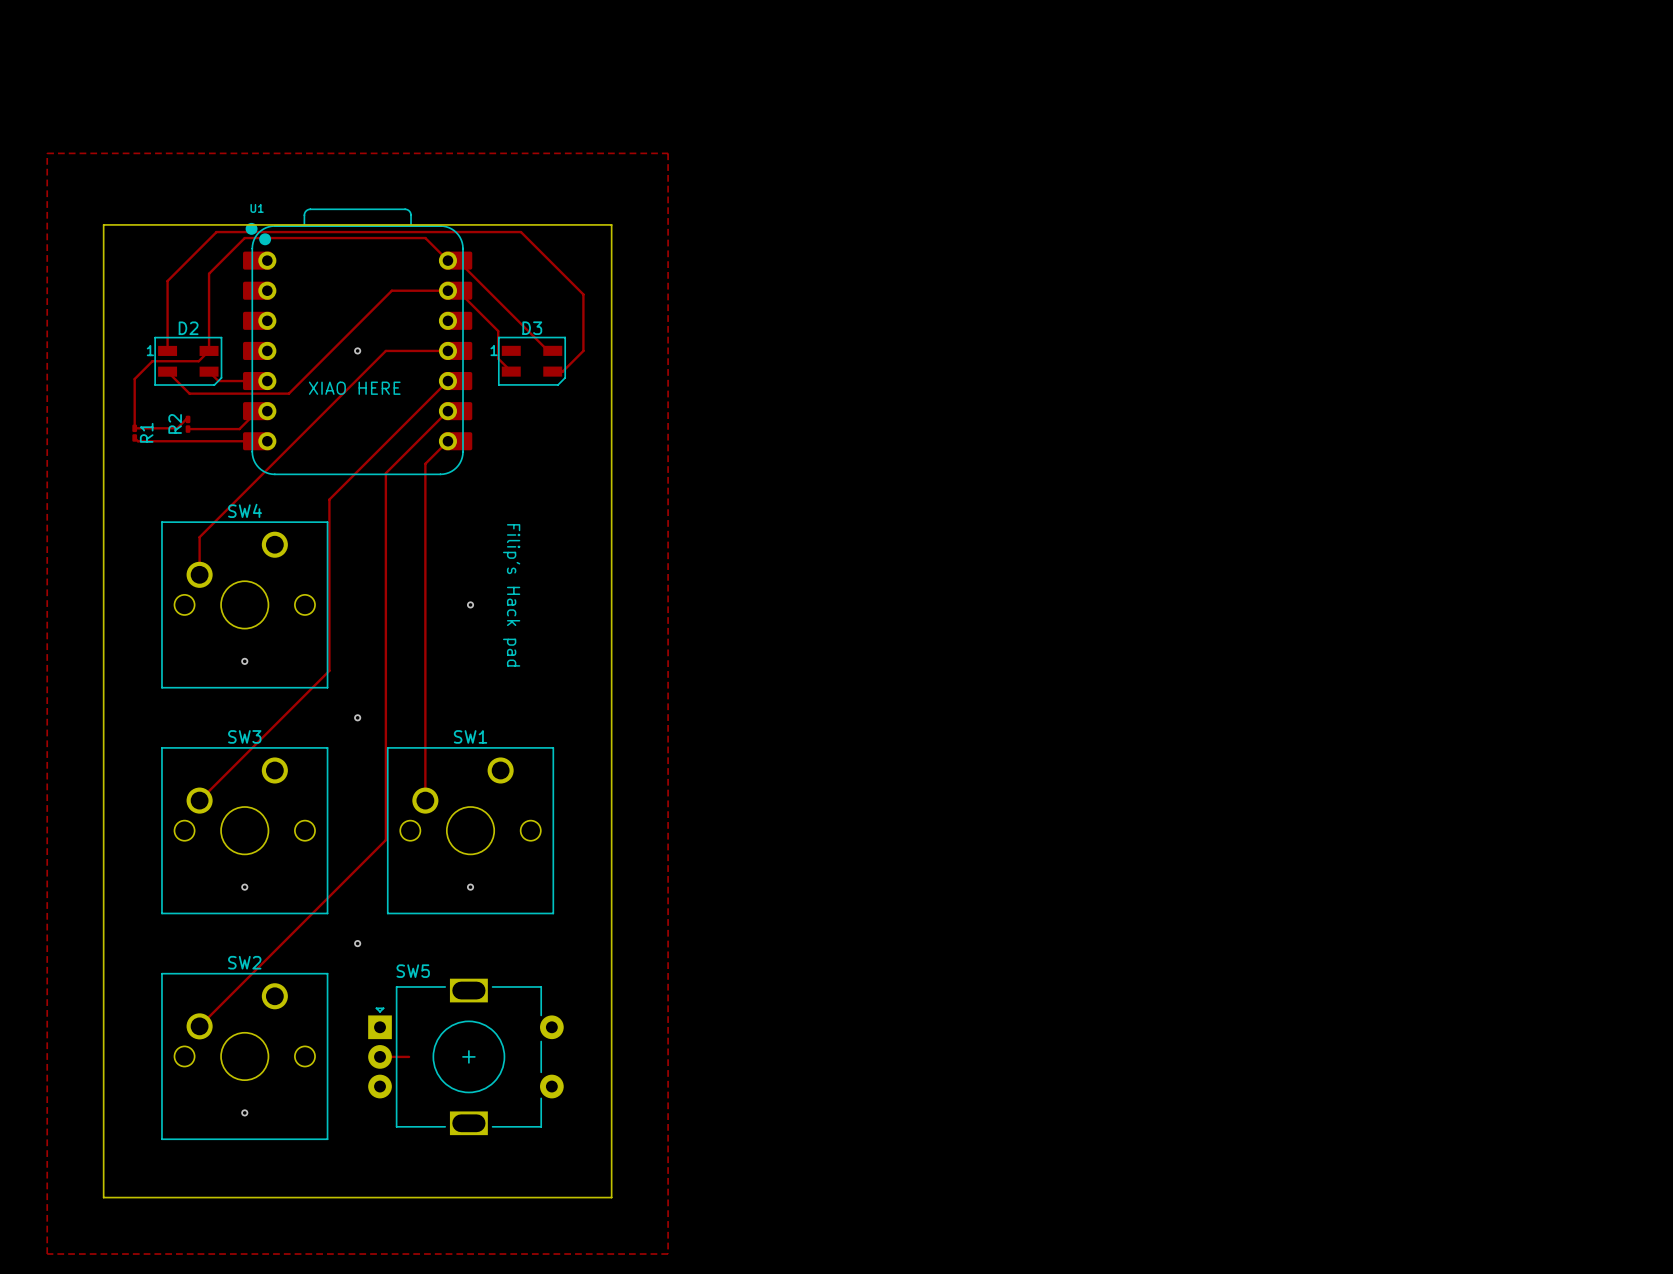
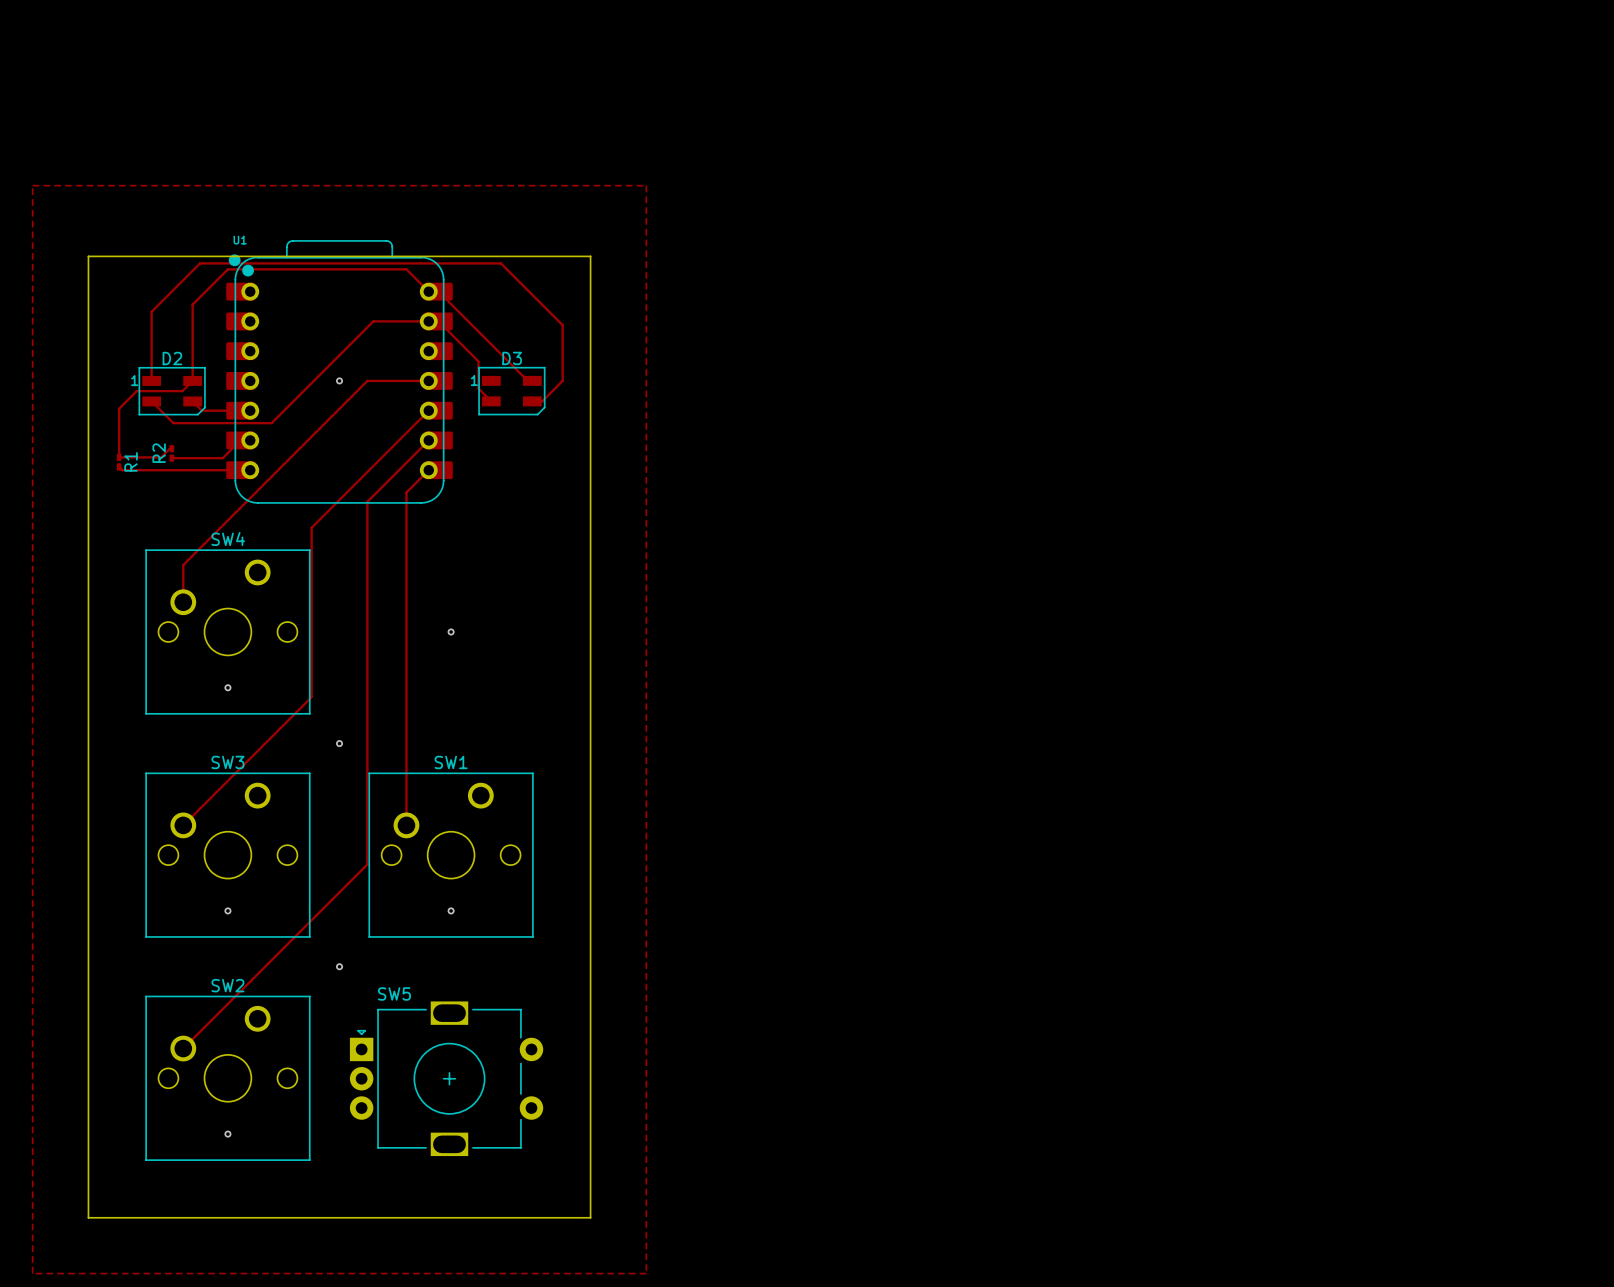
text: XIAO HERE (354, 388) -> none
text: Filip's Hack pad (511, 595) -> none
track: (380, 1056) (409, 1056) -> none

